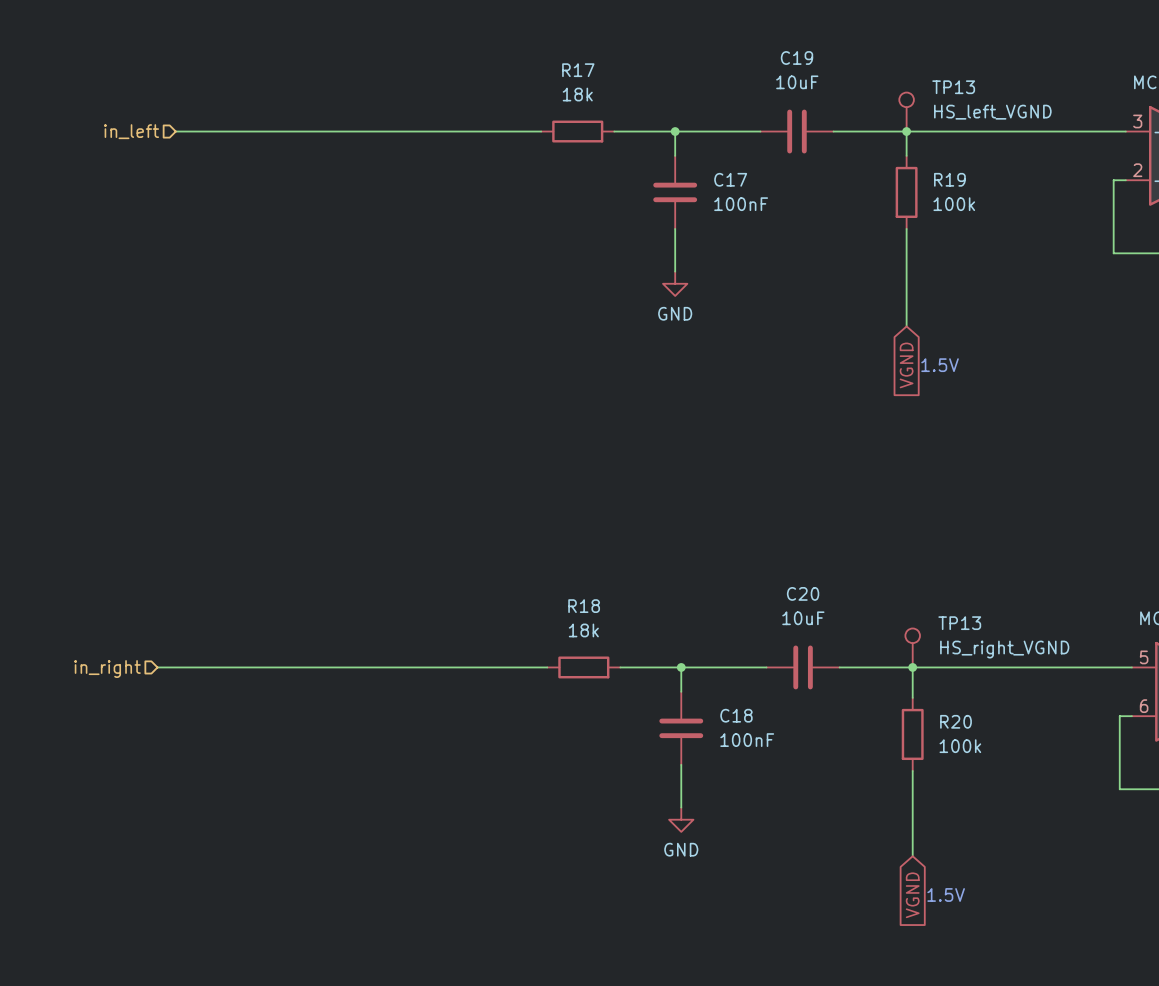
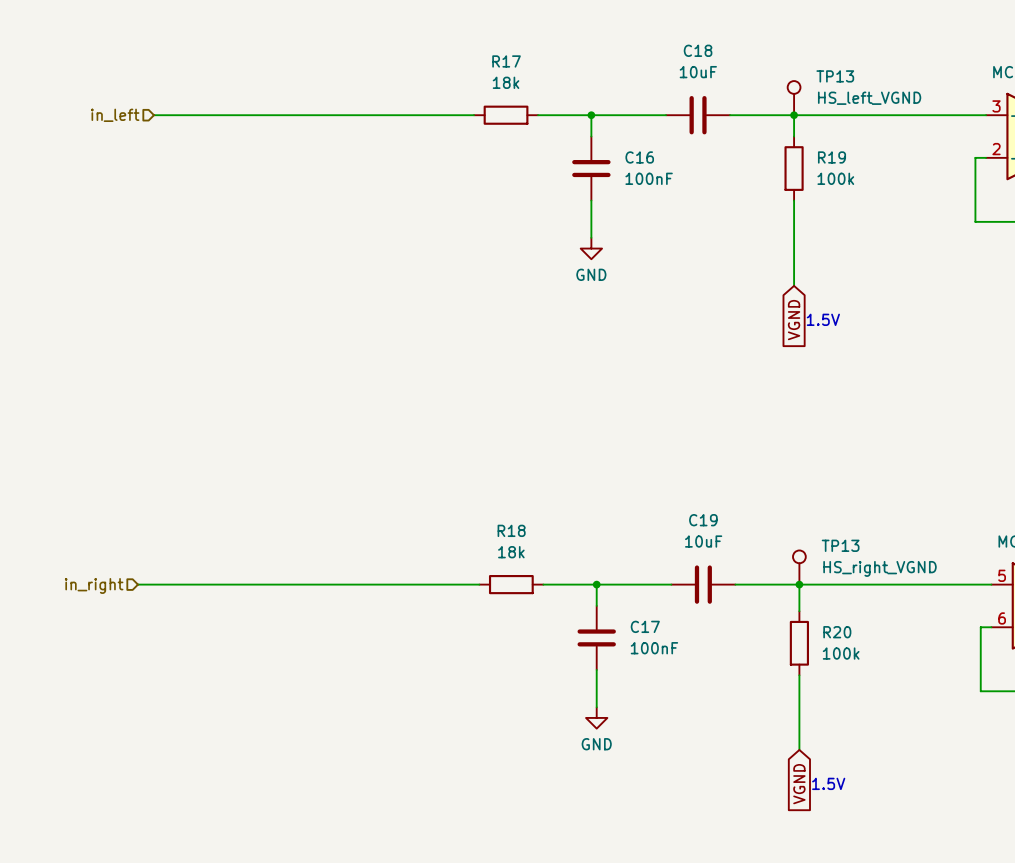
C19 name: C19 (796, 57) -> C18 (698, 50)
C17 name: C17 (730, 179) -> C16 (639, 157)
C20 name: C20 (803, 593) -> C19 (703, 520)
C18 name: C18 (736, 715) -> C17 (645, 626)

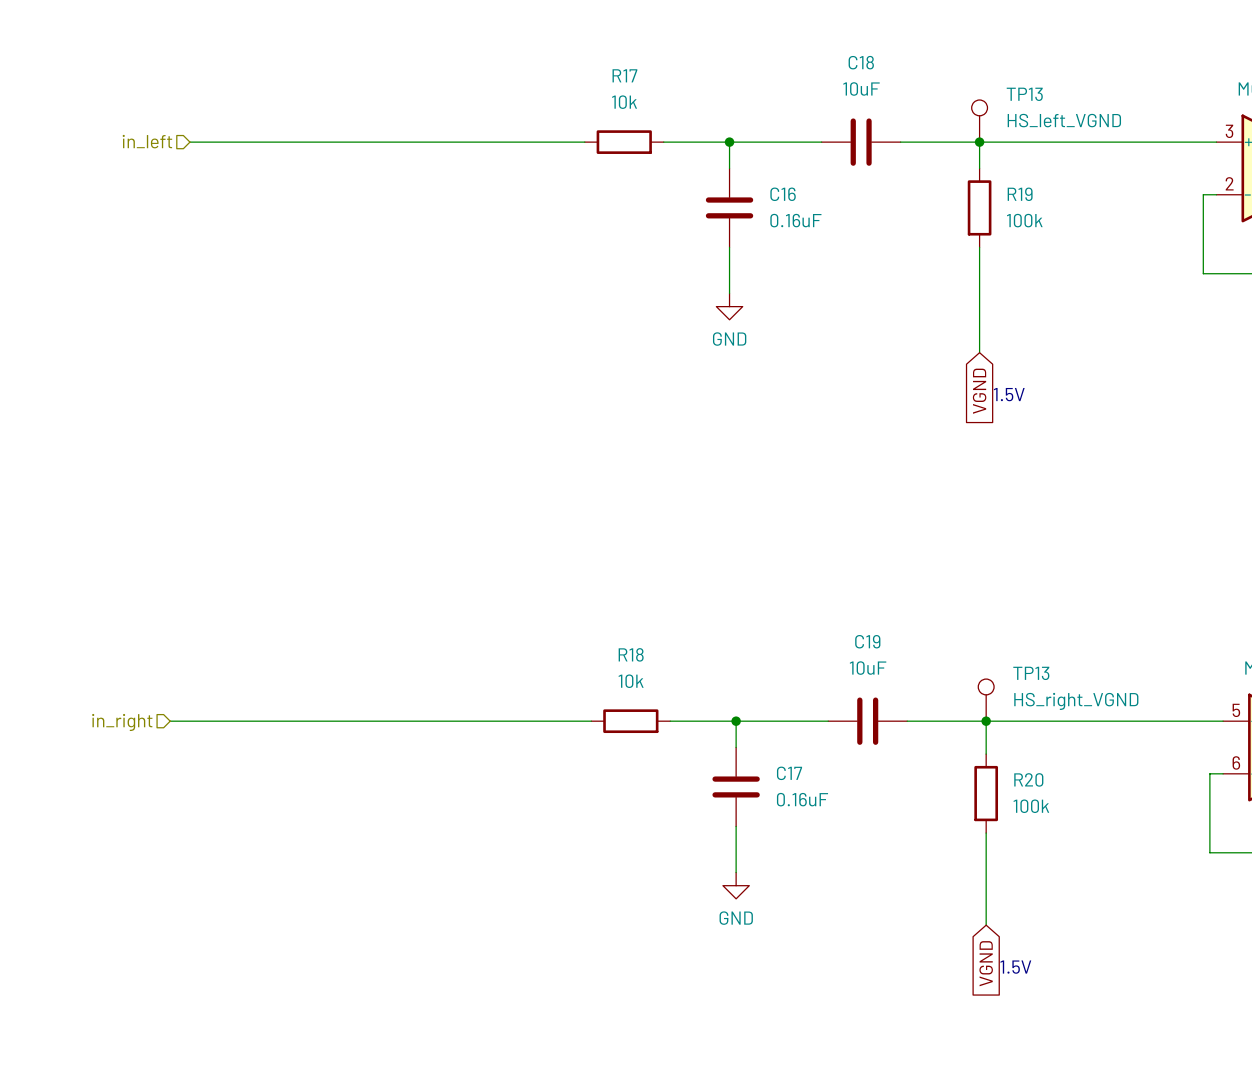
R17 value: 18k (506, 82) -> 10k (624, 102)
C16 value: 100nF (649, 178) -> 0.16uF (795, 220)
R18 value: 18k (511, 552) -> 10k (631, 681)
C17 value: 100nF (654, 648) -> 0.16uF (802, 799)

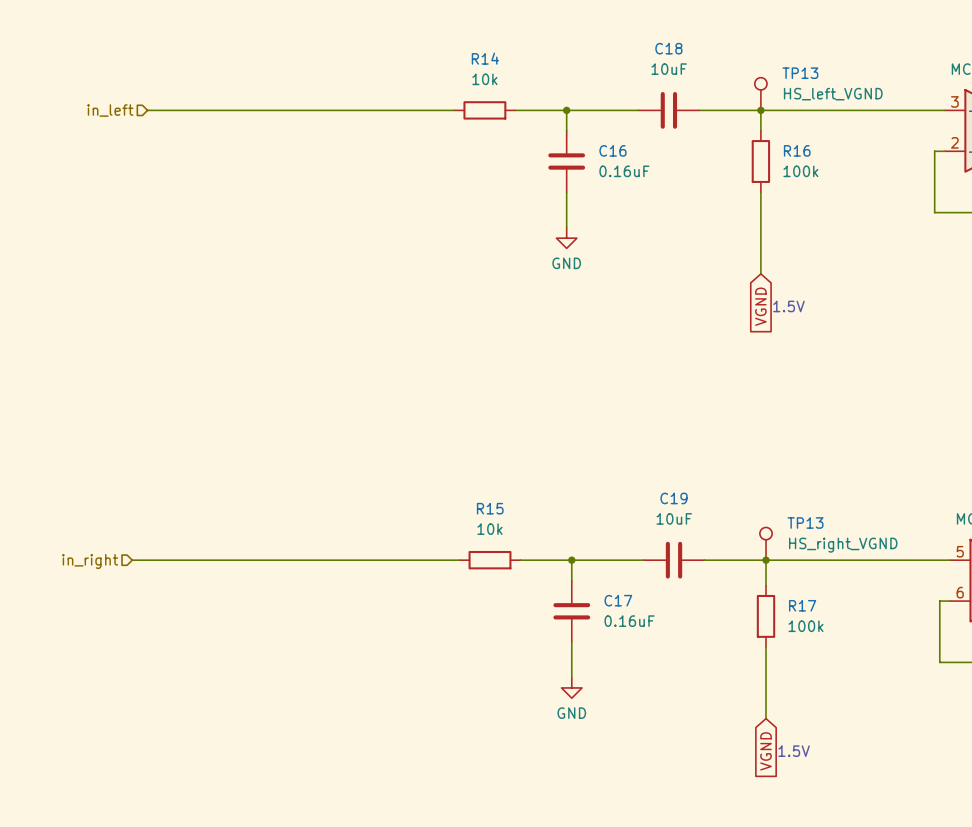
R17 name: R17 (624, 75) -> R14 (485, 58)
R19 name: R19 (1020, 194) -> R16 (797, 150)
R18 name: R18 (631, 654) -> R15 (490, 508)
R20 name: R20 (1028, 779) -> R17 (802, 605)

